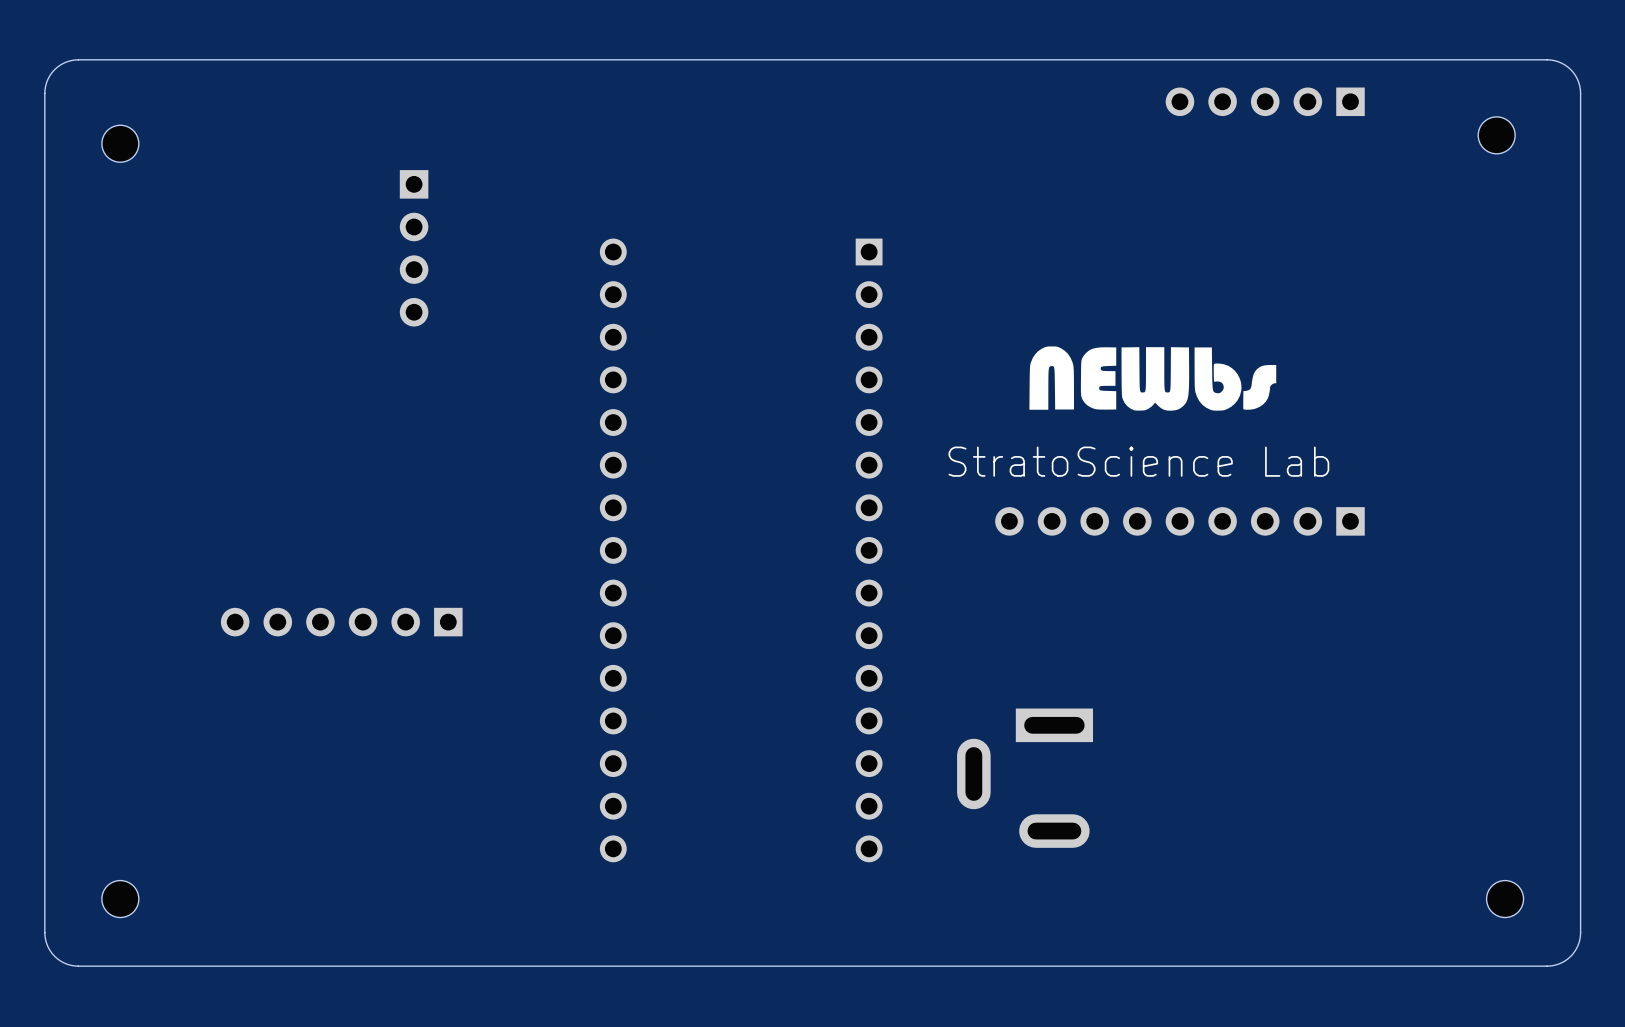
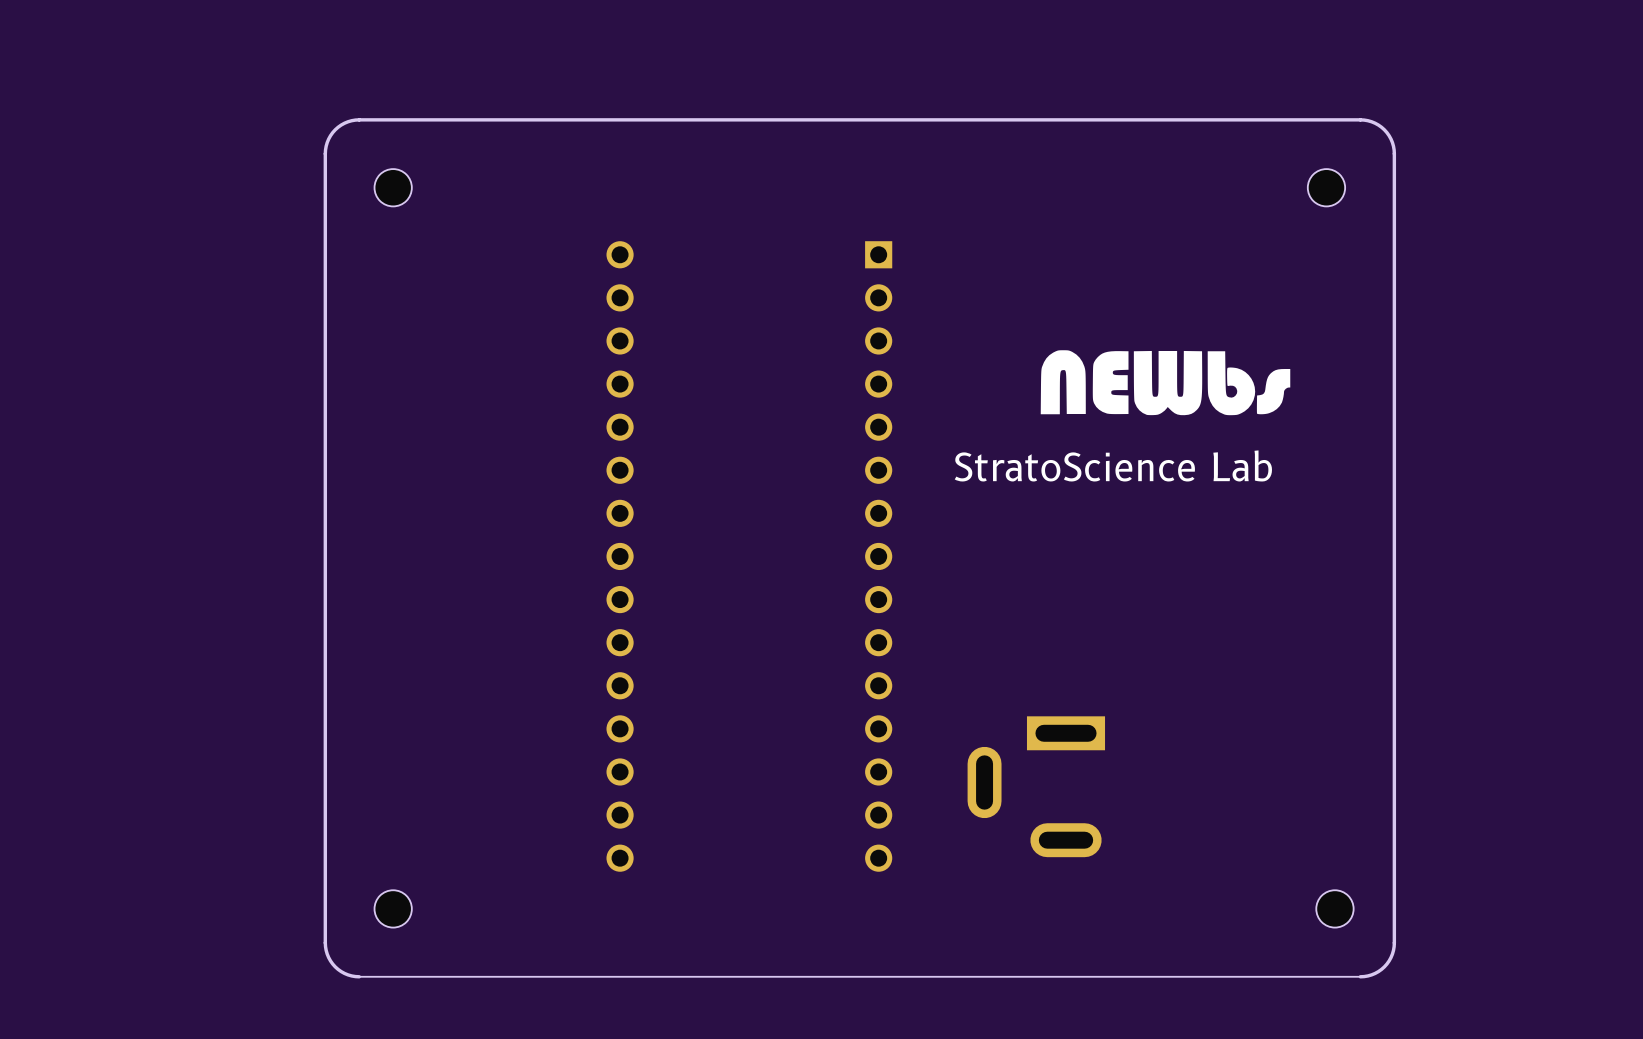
part: (1265, 101) -> none
part position: (1496, 135) -> (1326, 187)
part position: (120, 143) -> (393, 187)
part: (414, 248) -> none
part: (1179, 521) -> none
part: (341, 622) -> none
part position: (120, 899) -> (393, 908)
part position: (1505, 899) -> (1334, 908)
board edge: (1345, 966) (1550, 965) (1561, 962) (1570, 956) (1579, 940) (1580, 93) (1577, 78) (1564, 64) (1547, 59) (78, 59) (67, 61) (52, 72) (46, 82) (44, 93) (44, 932) (46, 943) (57, 958) (74, 965) (355, 966) -> (1360, 976) (1375, 973) (1384, 966) (1392, 954) (1394, 942) (1394, 153) (1390, 139) (1384, 129) (1375, 123) (1360, 119) (359, 119) (348, 121) (338, 127) (328, 139) (325, 153) (325, 942) (328, 957) (335, 966) (344, 973) (359, 976)

